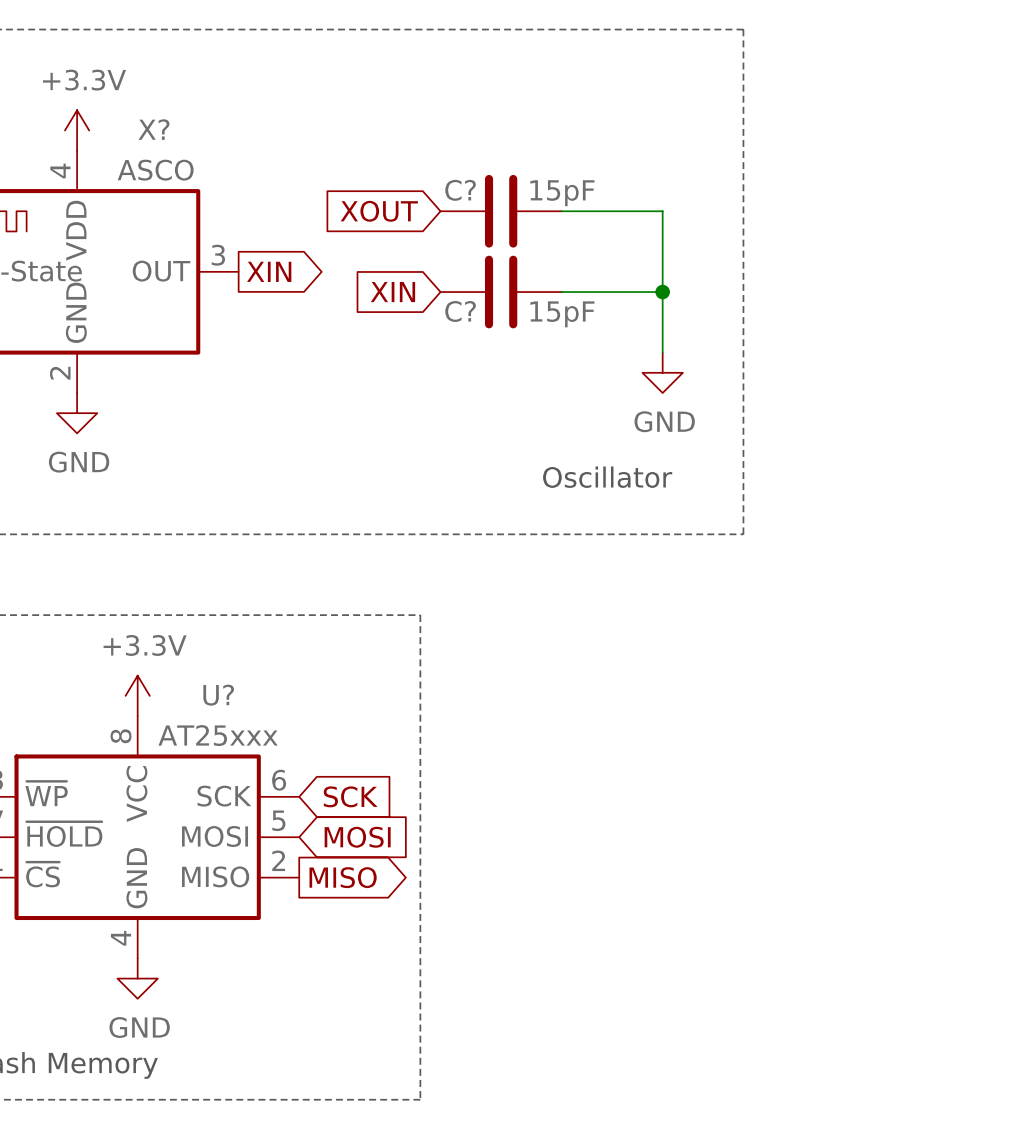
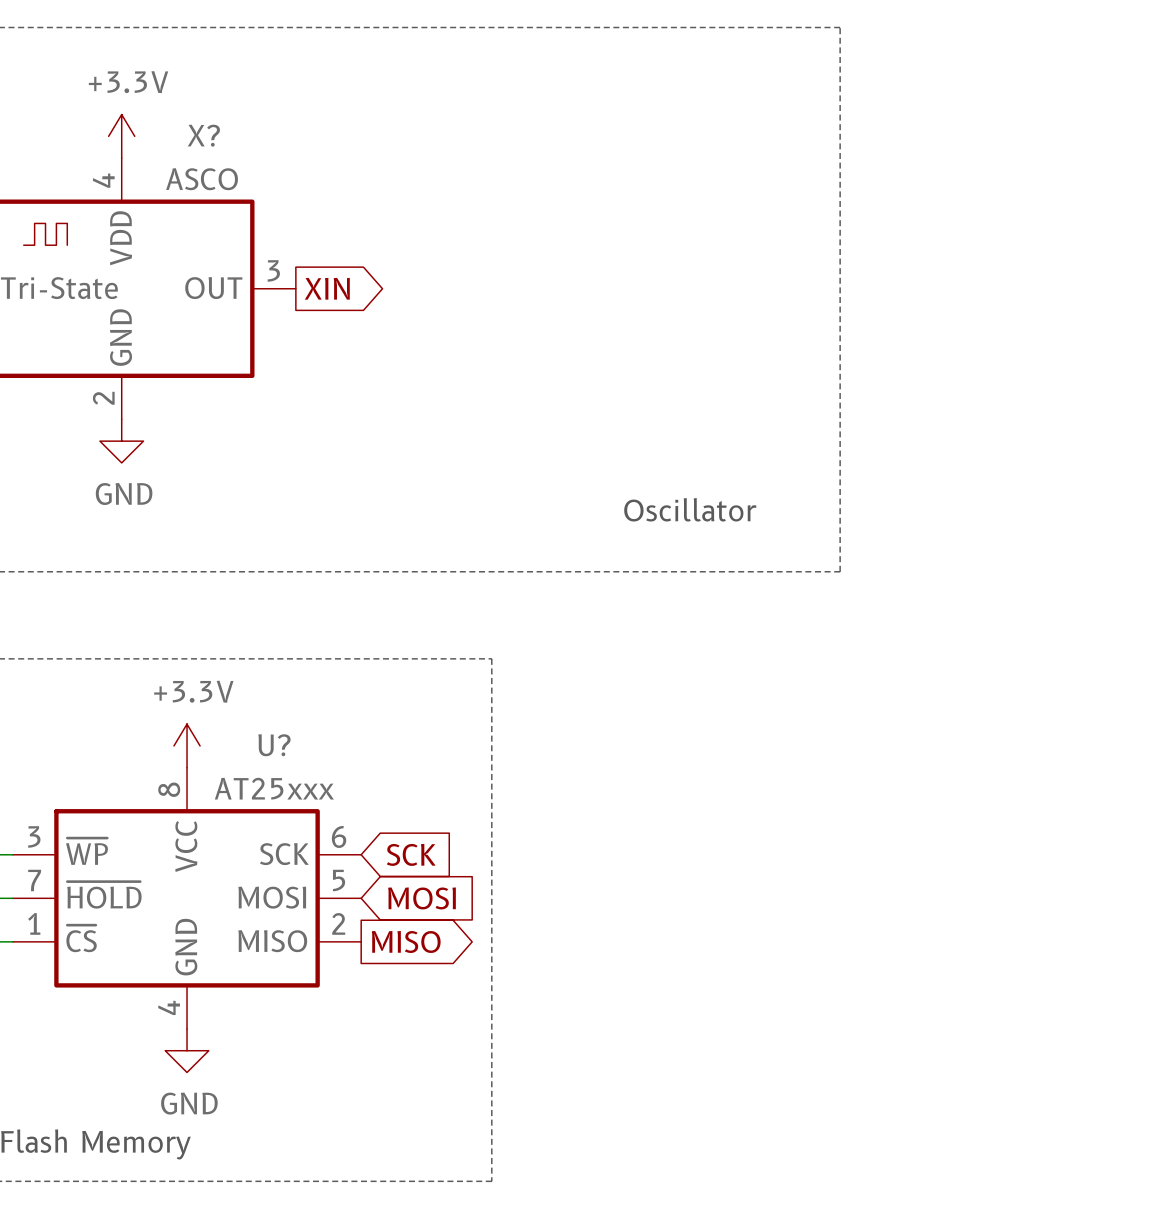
global label: XOUT (379, 211) -> none
C?: 15pF (501, 211) -> none
wire: (561, 211) (662, 211) (662, 352) -> none
global label: XIN (392, 292) -> none
C?: 15pF (501, 292) -> none
wire: (561, 292) (662, 292) -> none
junction: (662, 292) -> none
power symbol: GND (662, 372) -> none

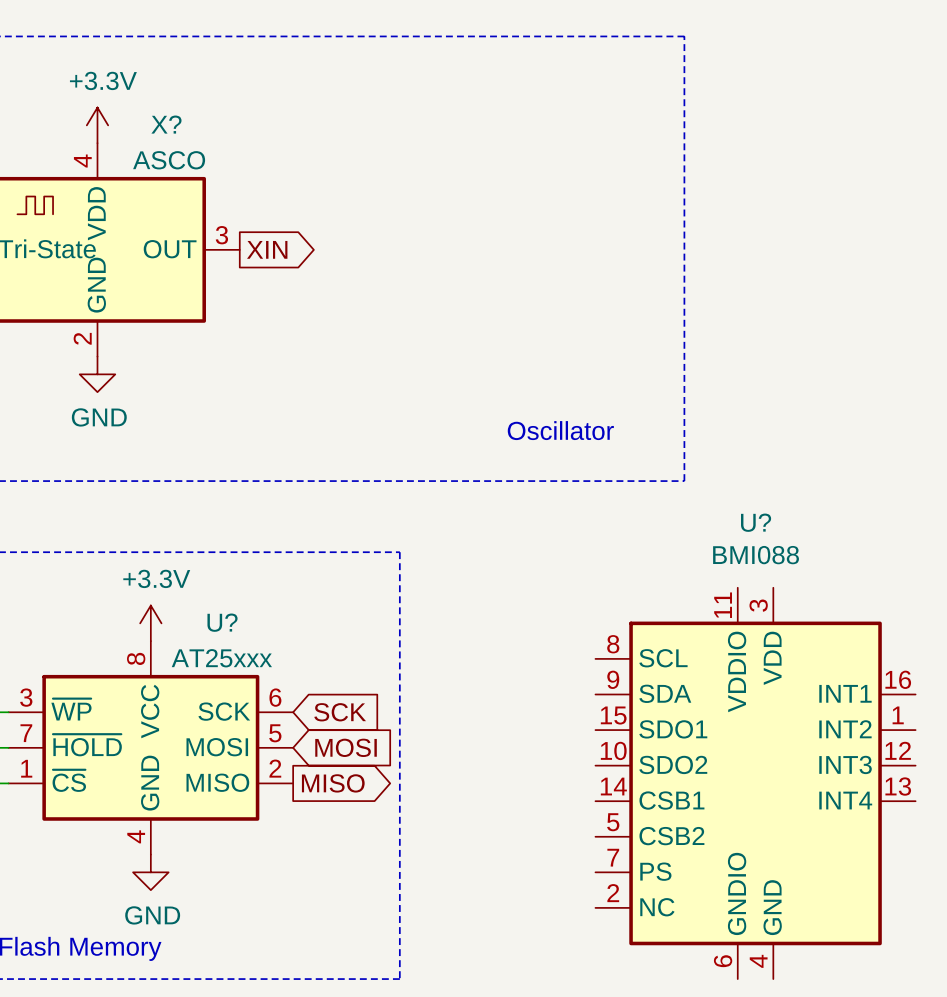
U?: none -> BMI088 (755, 783)

